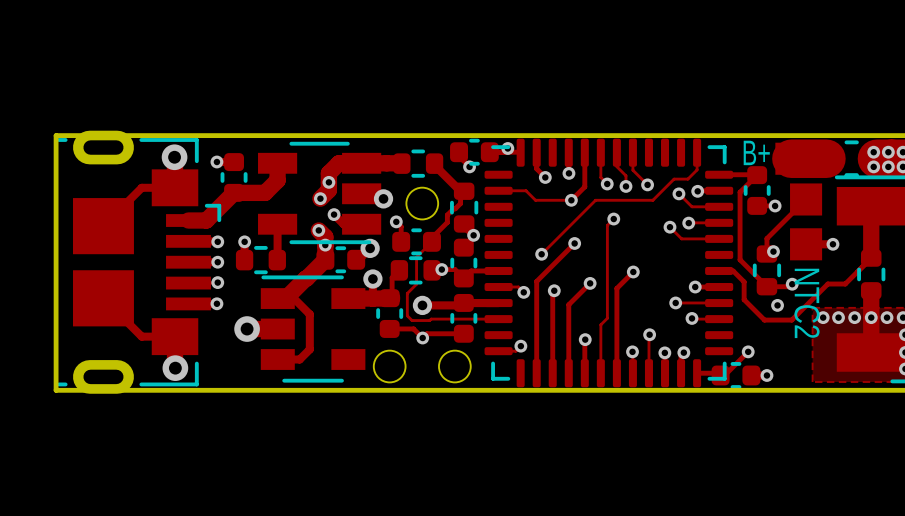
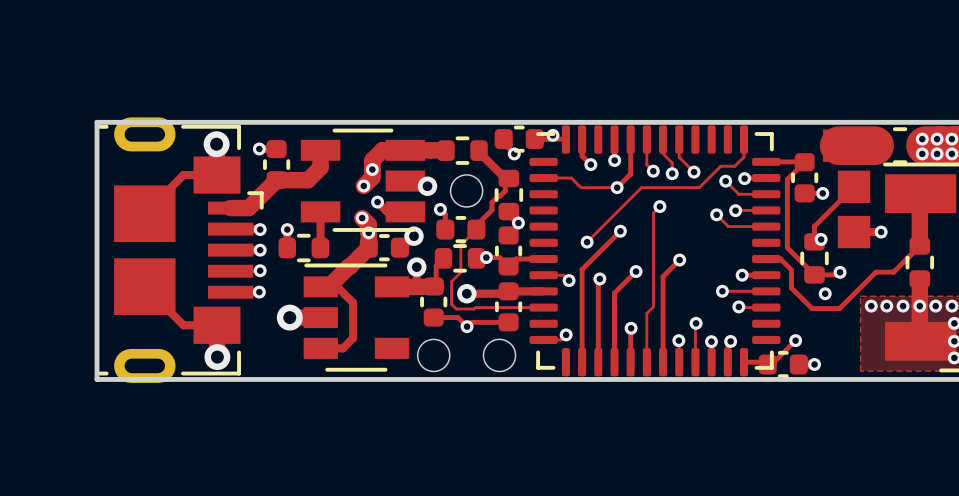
text: B+ (756, 152) -> none
text: NTC2 (806, 303) -> none

